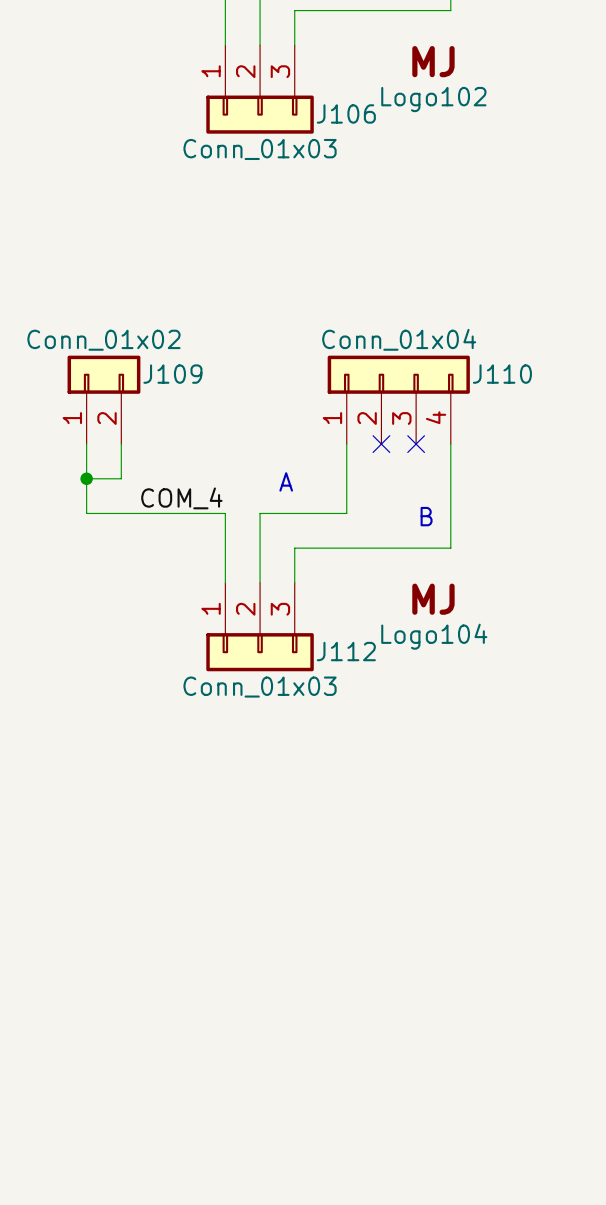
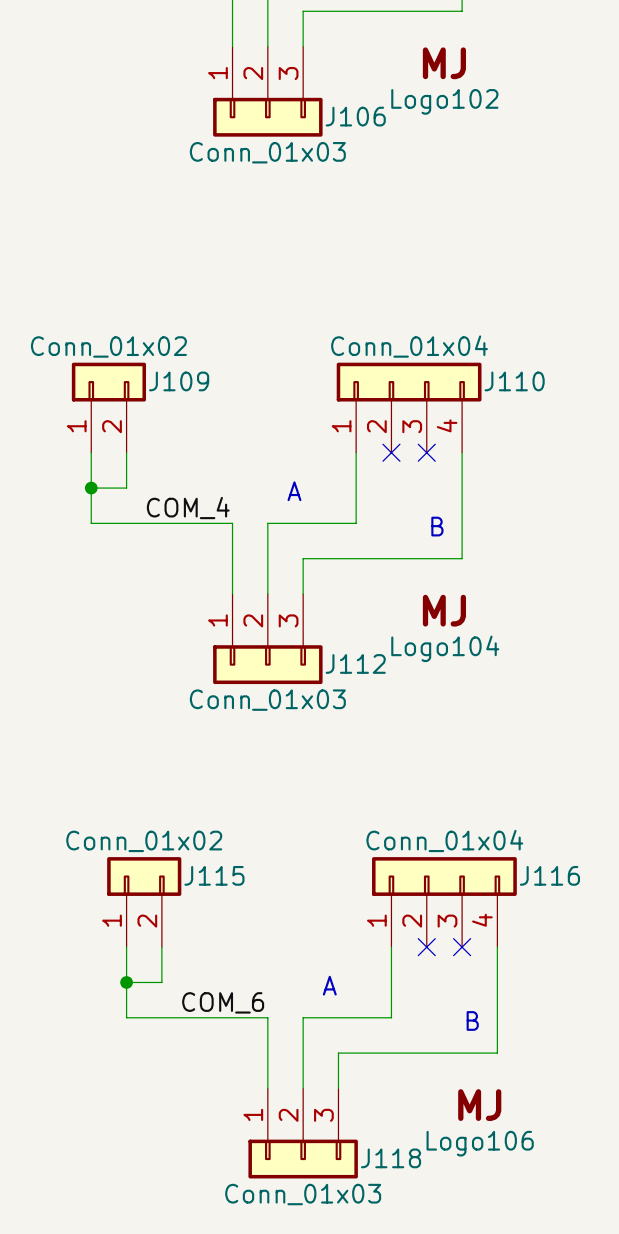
J115: none -> Conn_01x02 (144, 902)
J116: none -> Conn_01x04 (444, 902)
wire: none -> (126, 947) (126, 1017) (267, 1017) (267, 1088)
wire: none -> (161, 947) (161, 982) (126, 982)
wire: none -> (391, 947) (391, 1017) (303, 1017) (303, 1088)
no-connect mark: none -> (426, 947)
no-connect mark: none -> (462, 947)
wire: none -> (497, 947) (497, 1053) (338, 1053) (338, 1088)
junction: none -> (126, 982)
text: none -> A (329, 985)
label: none -> COM_6 (223, 1002)
text: none -> B (472, 1020)
Logo106: none -> (480, 1122)
J118: none -> Conn_01x03 (303, 1133)

